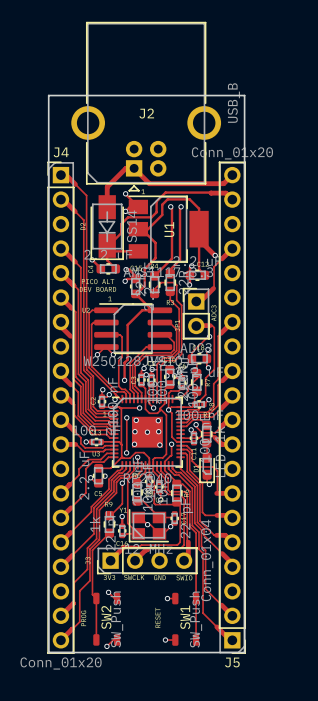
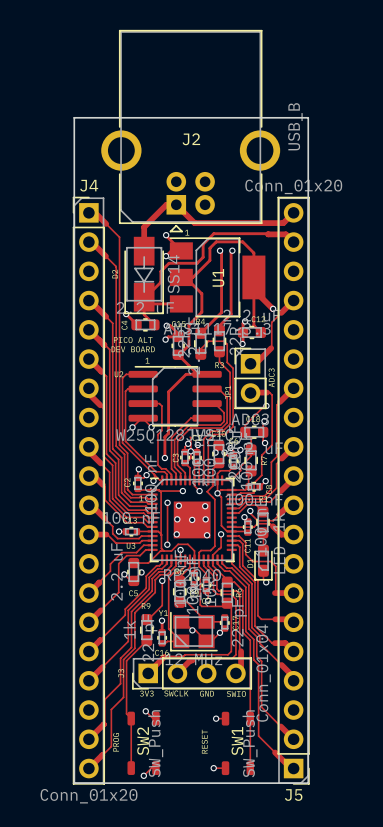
track: none -> (190, 437) (190, 458) (185, 463)
via: none -> (240, 449)
track: (145, 399) (145, 409) (149, 413) (157, 413) (159, 408) -> none

